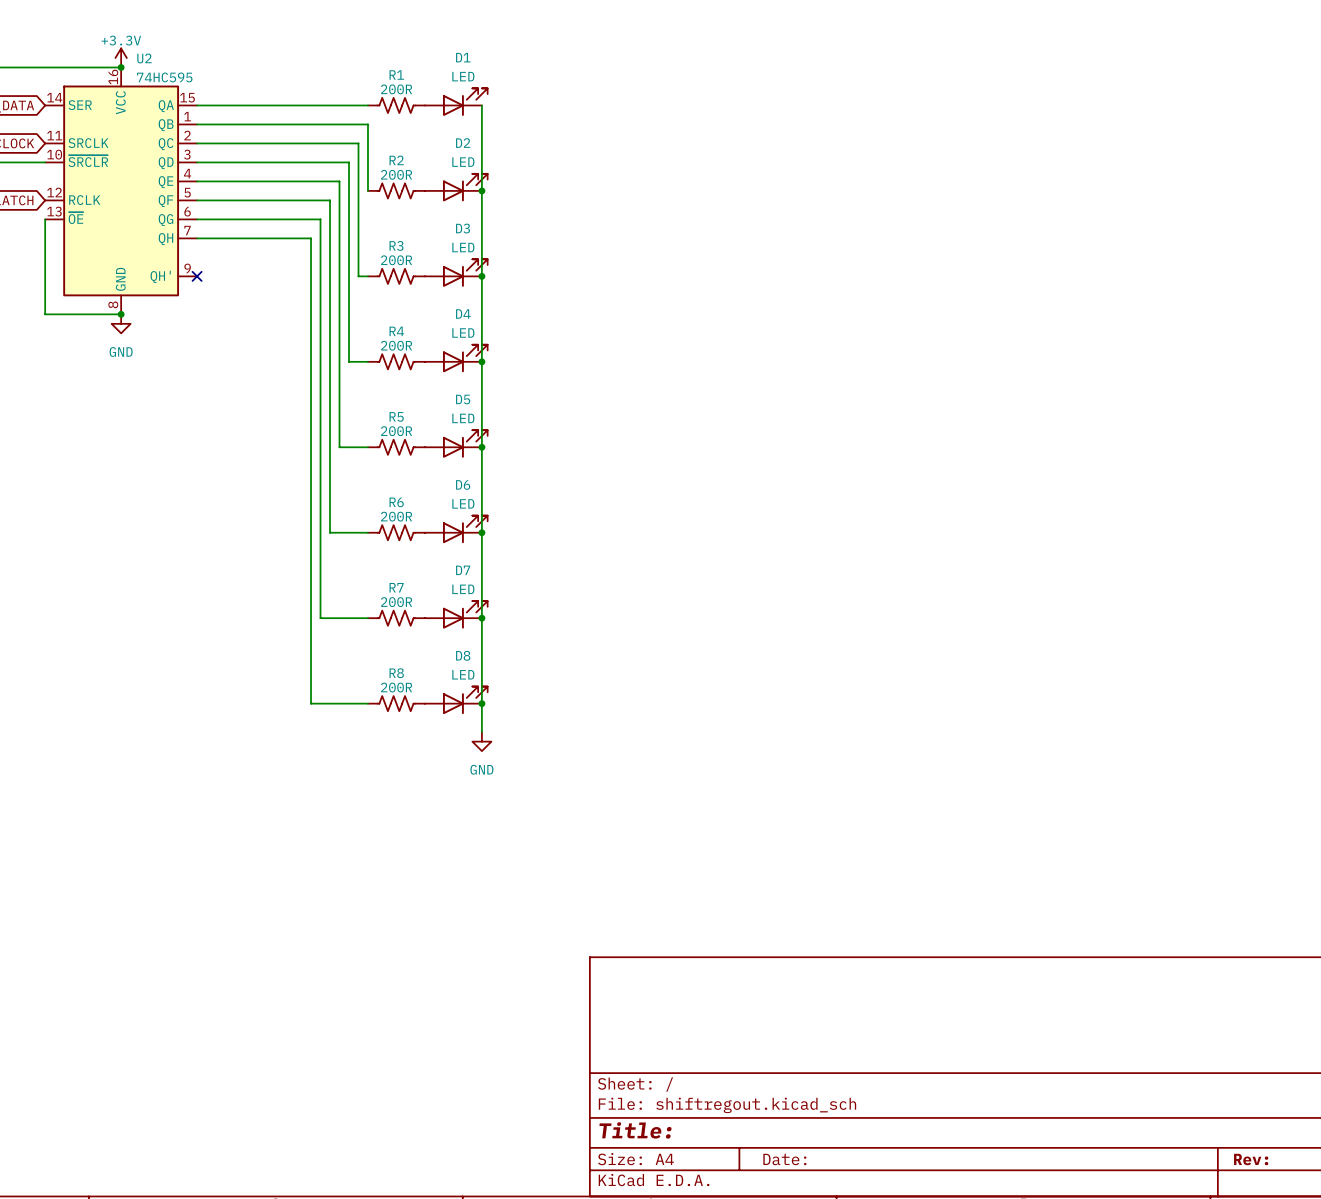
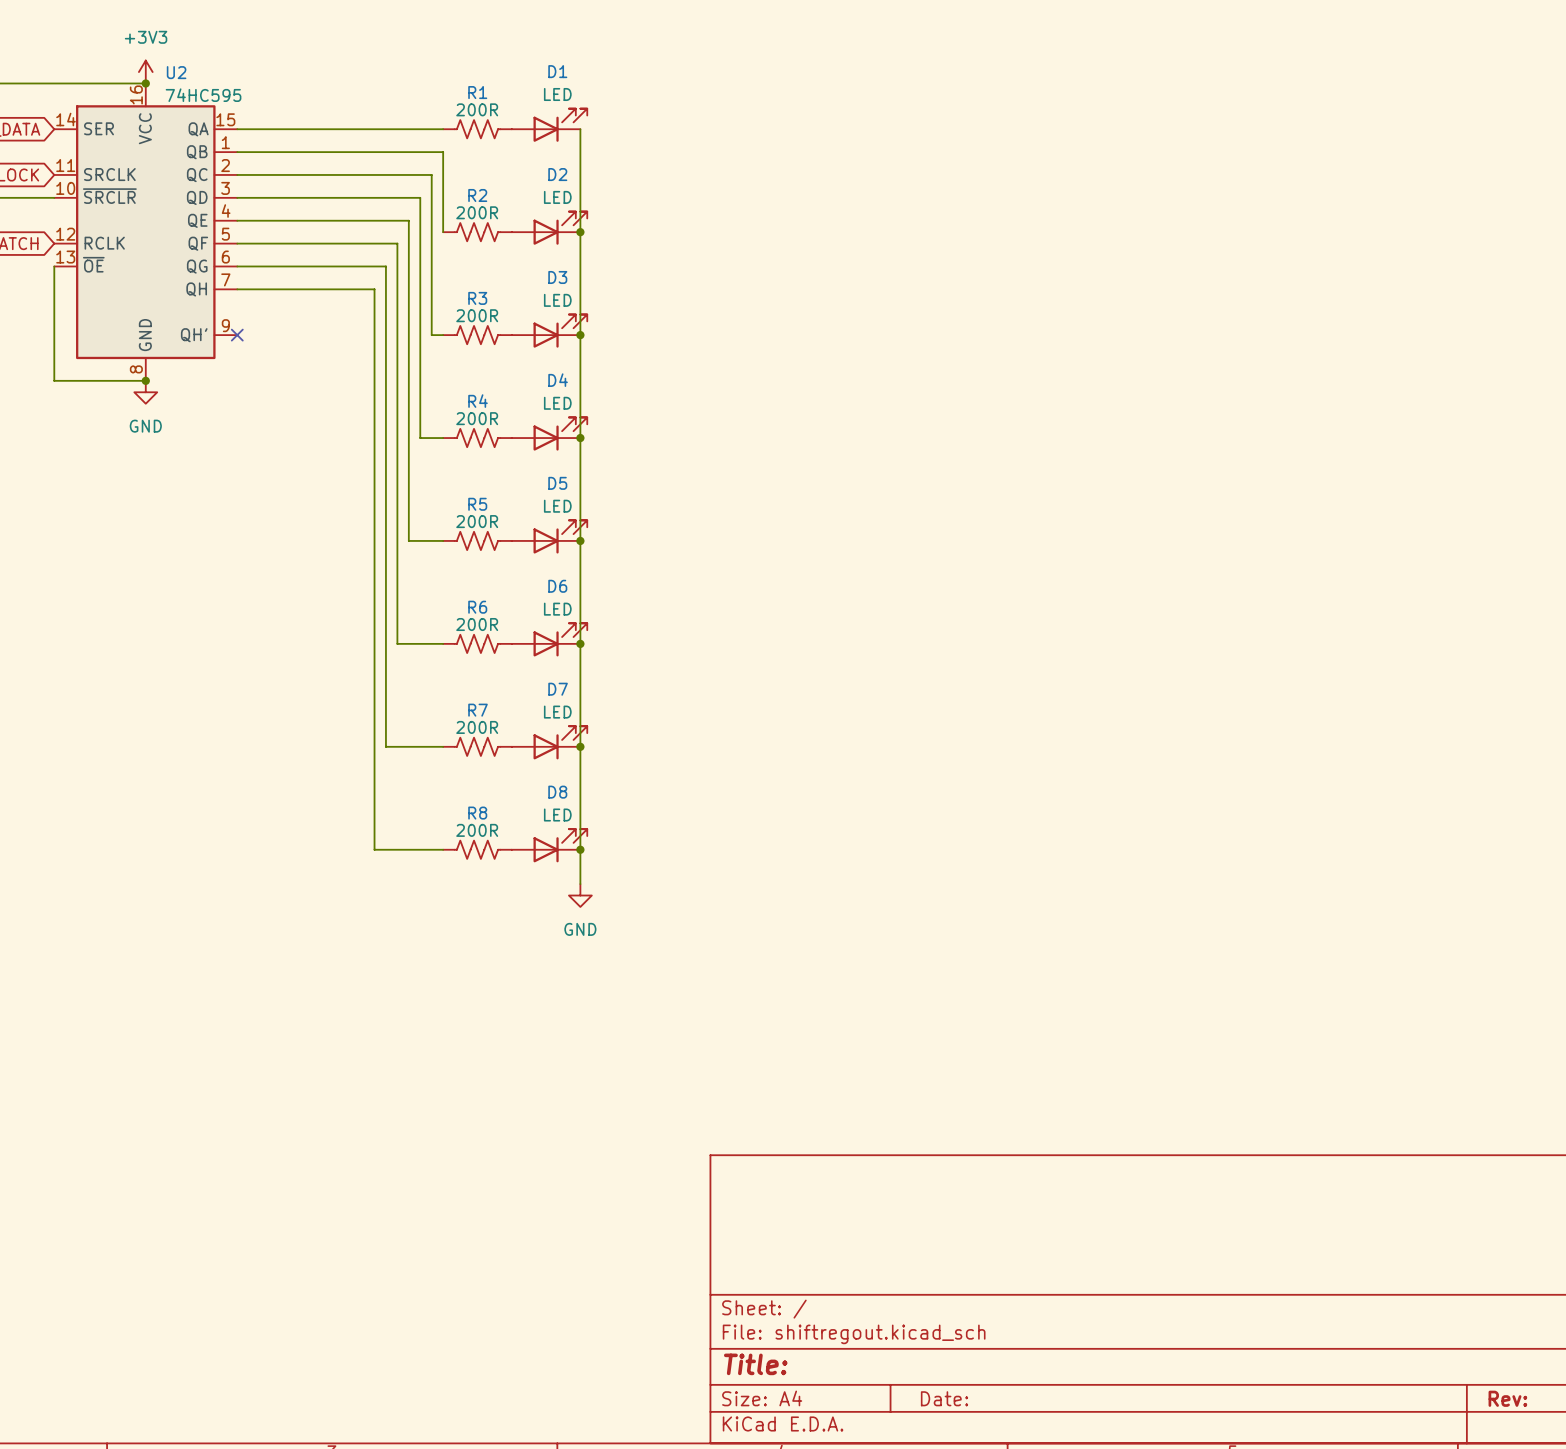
power symbol: +3.3V (121, 58) -> +3V3 (145, 72)

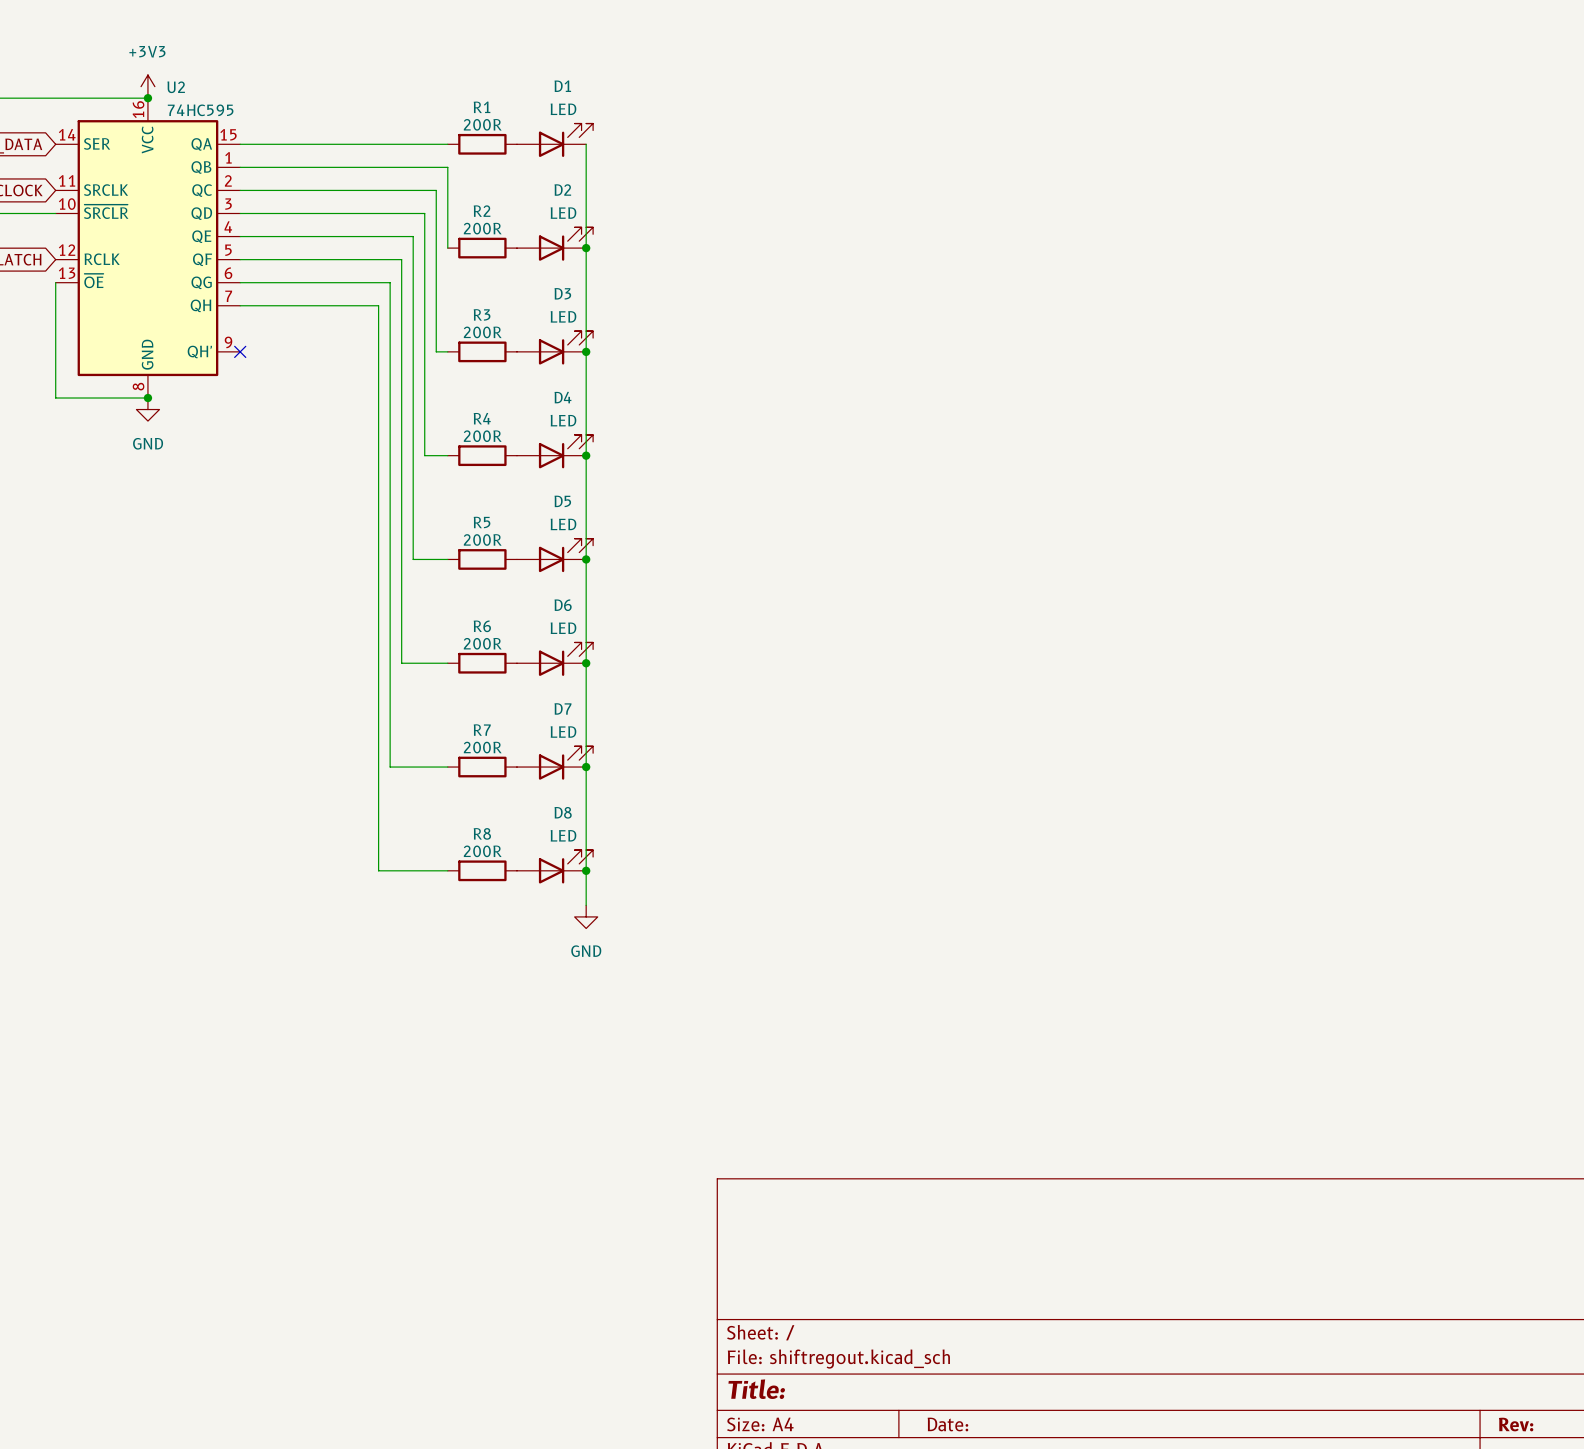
R1 symbol: [443, 120, 512, 139] -> [447, 133, 517, 155]
R2 symbol: [443, 223, 512, 242] -> [447, 237, 517, 259]
R3 symbol: [443, 325, 512, 345] -> [447, 341, 517, 363]
R4 symbol: [443, 428, 512, 448] -> [447, 445, 517, 467]
R5 symbol: [443, 531, 512, 551] -> [447, 549, 517, 570]
R6 symbol: [443, 634, 512, 654] -> [447, 652, 517, 674]
R7 symbol: [443, 737, 512, 756] -> [447, 756, 517, 778]
R8 symbol: [443, 840, 512, 859] -> [447, 860, 517, 882]

